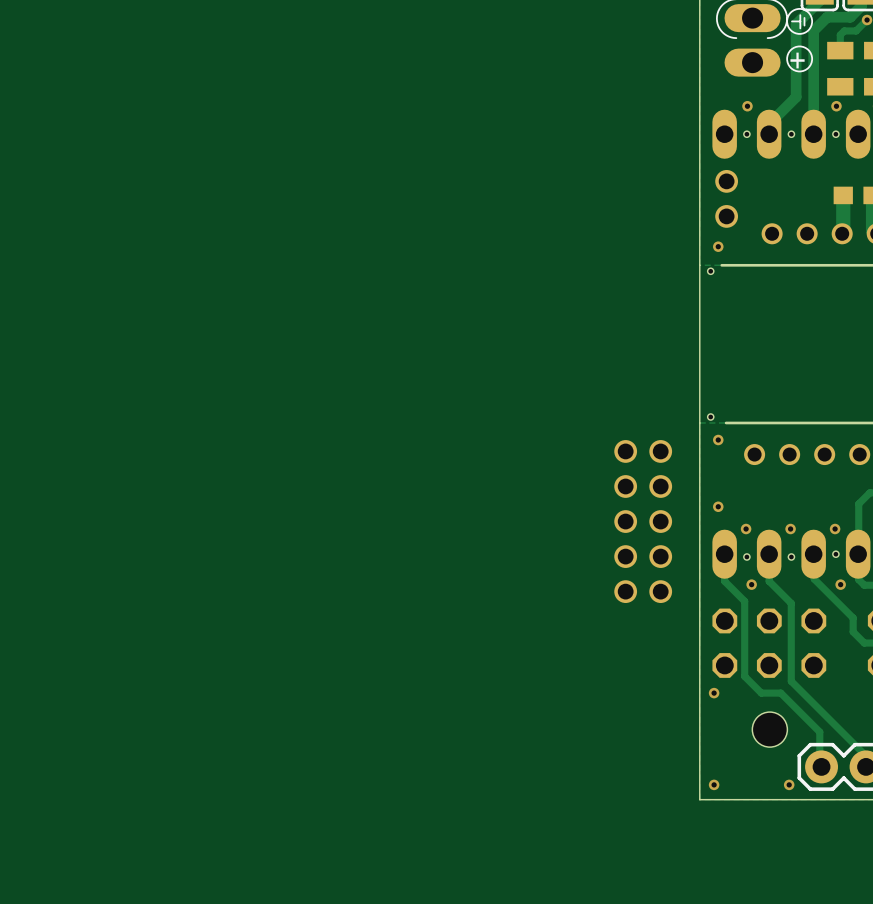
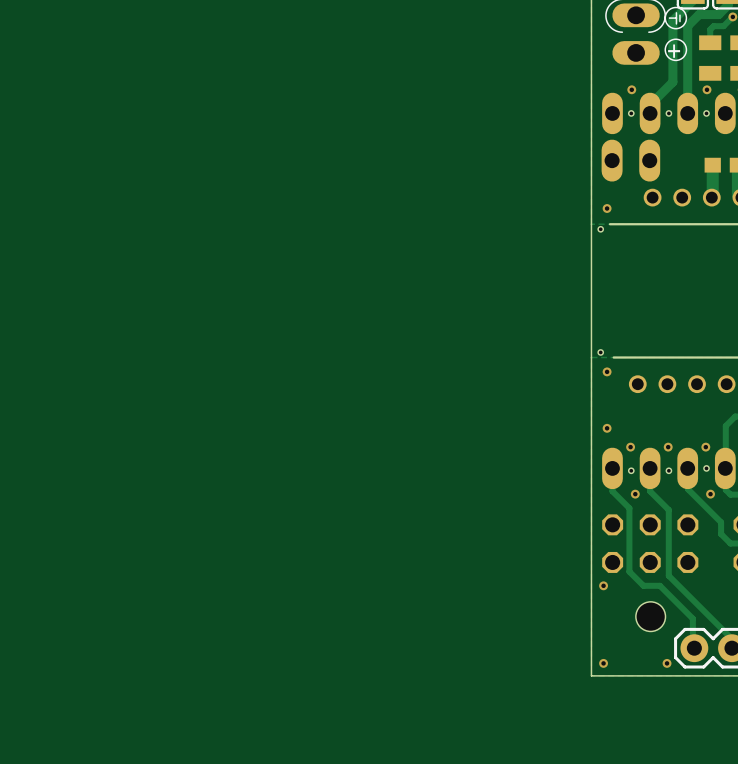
part: none -> (630, 160)
part: (726, 198) -> none
part: (643, 521) -> none

